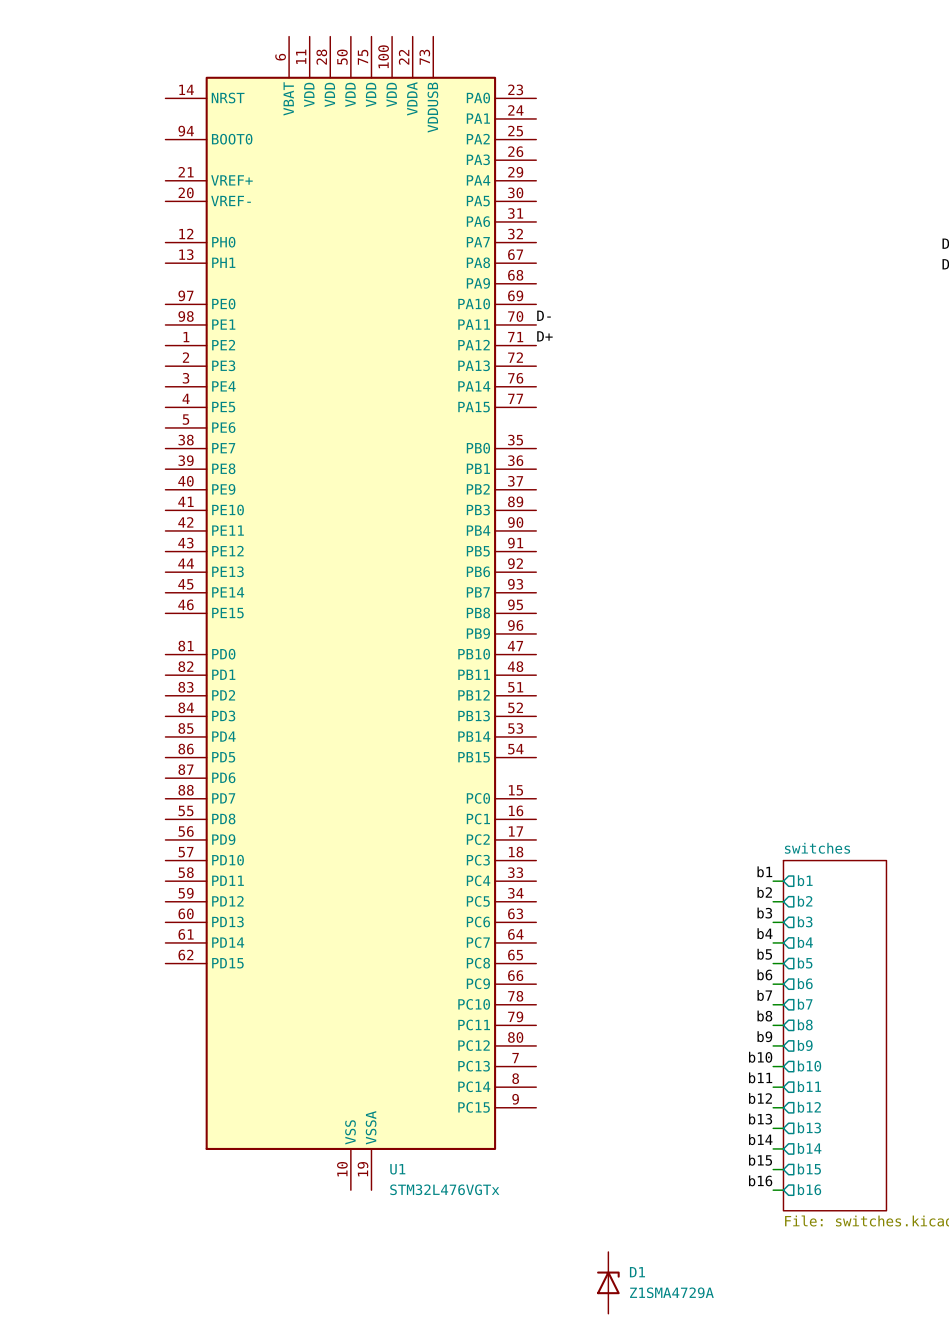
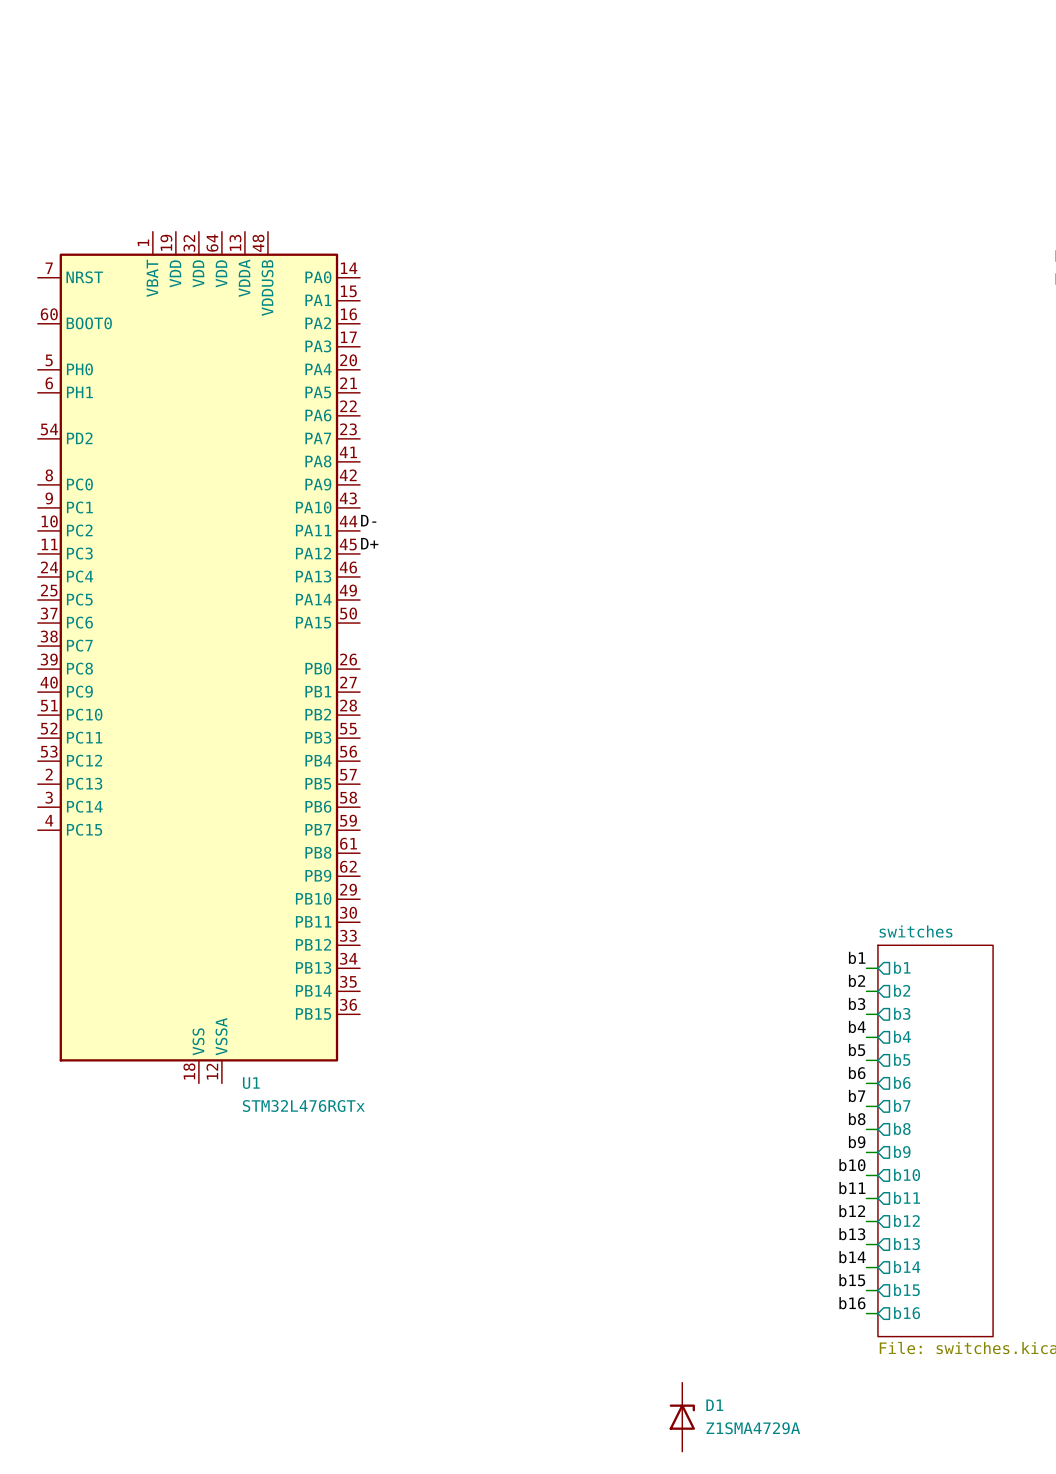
U1 symbol: [165, 36, 537, 1191] -> [37, 231, 361, 1084]
label: D- (544, 315) -> none
label: D+ (544, 336) -> none
label: none -> D- (368, 520)
label: none -> D+ (369, 543)
U1 name position: U1 (397, 1169) -> U1 (251, 1083)
U1 value: STM32L476VGTx (444, 1189) -> STM32L476RGTx (303, 1105)

